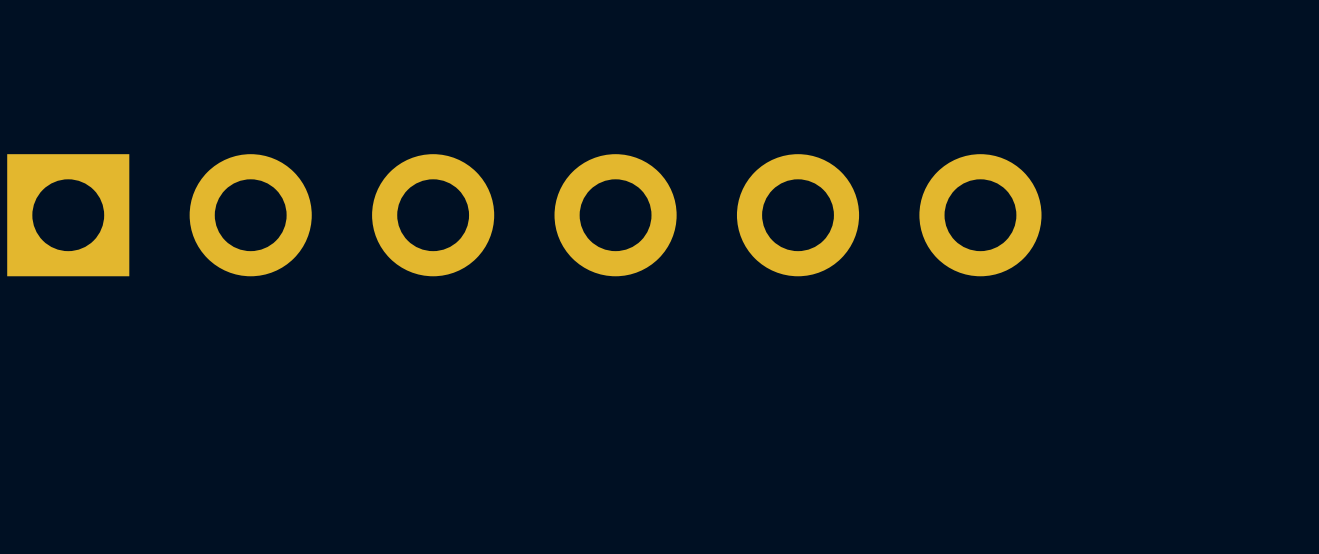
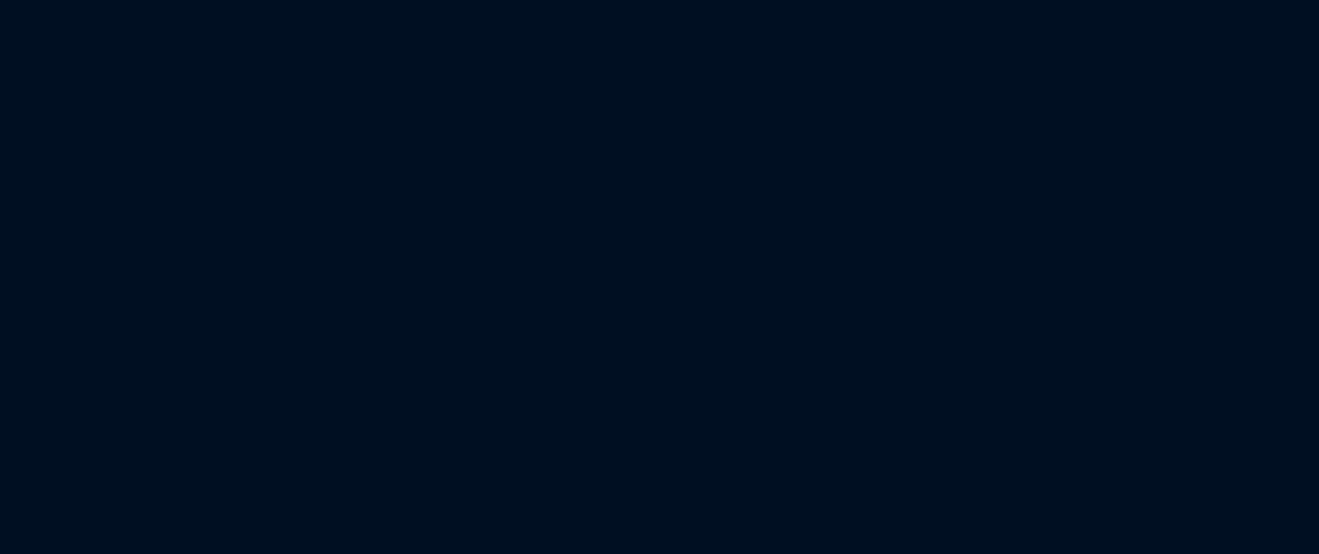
part: (524, 215) -> none

